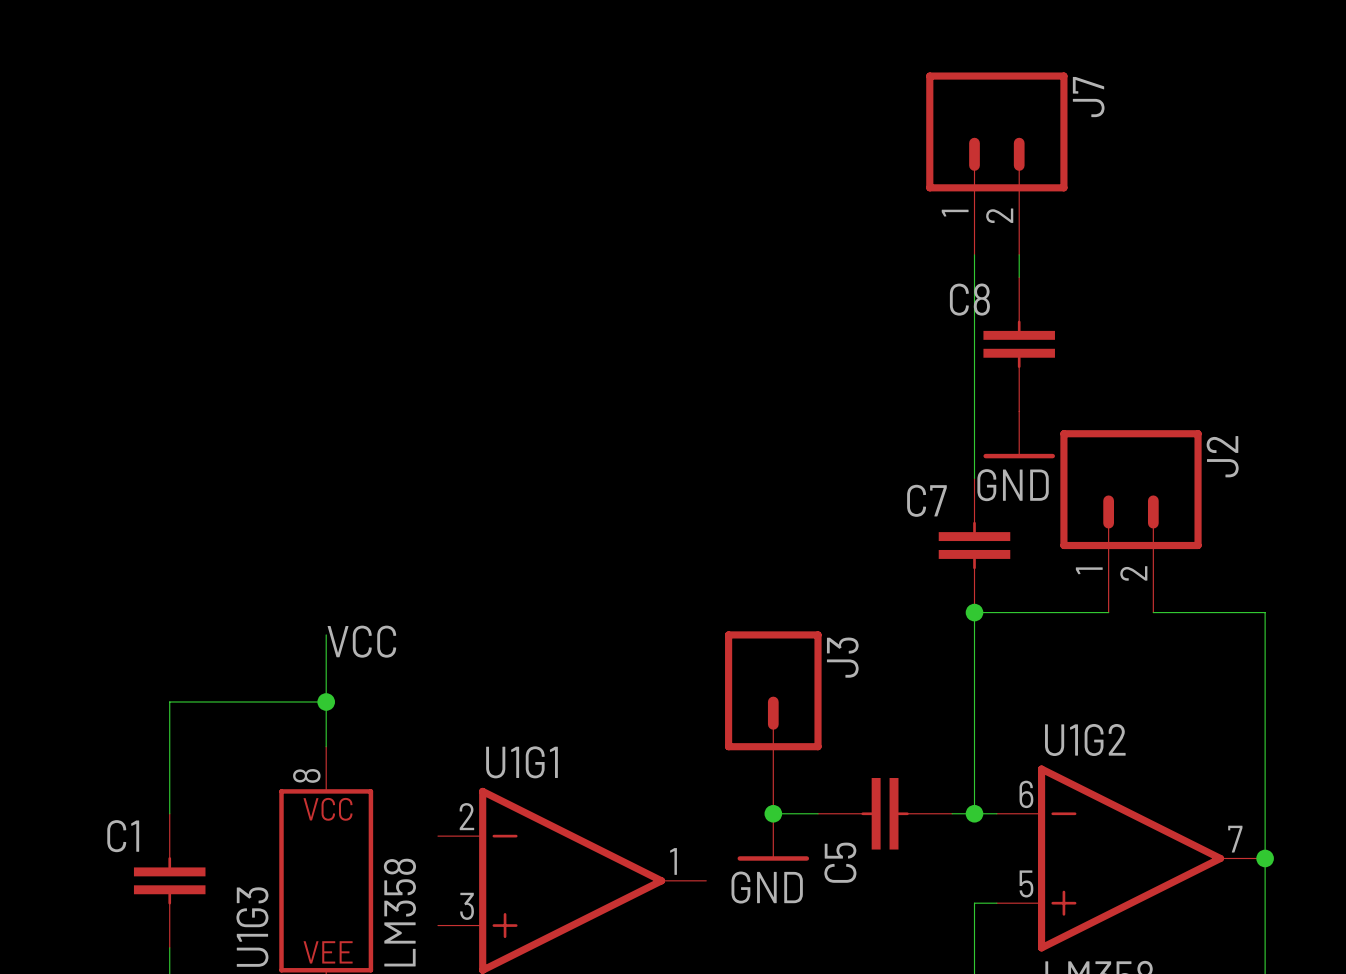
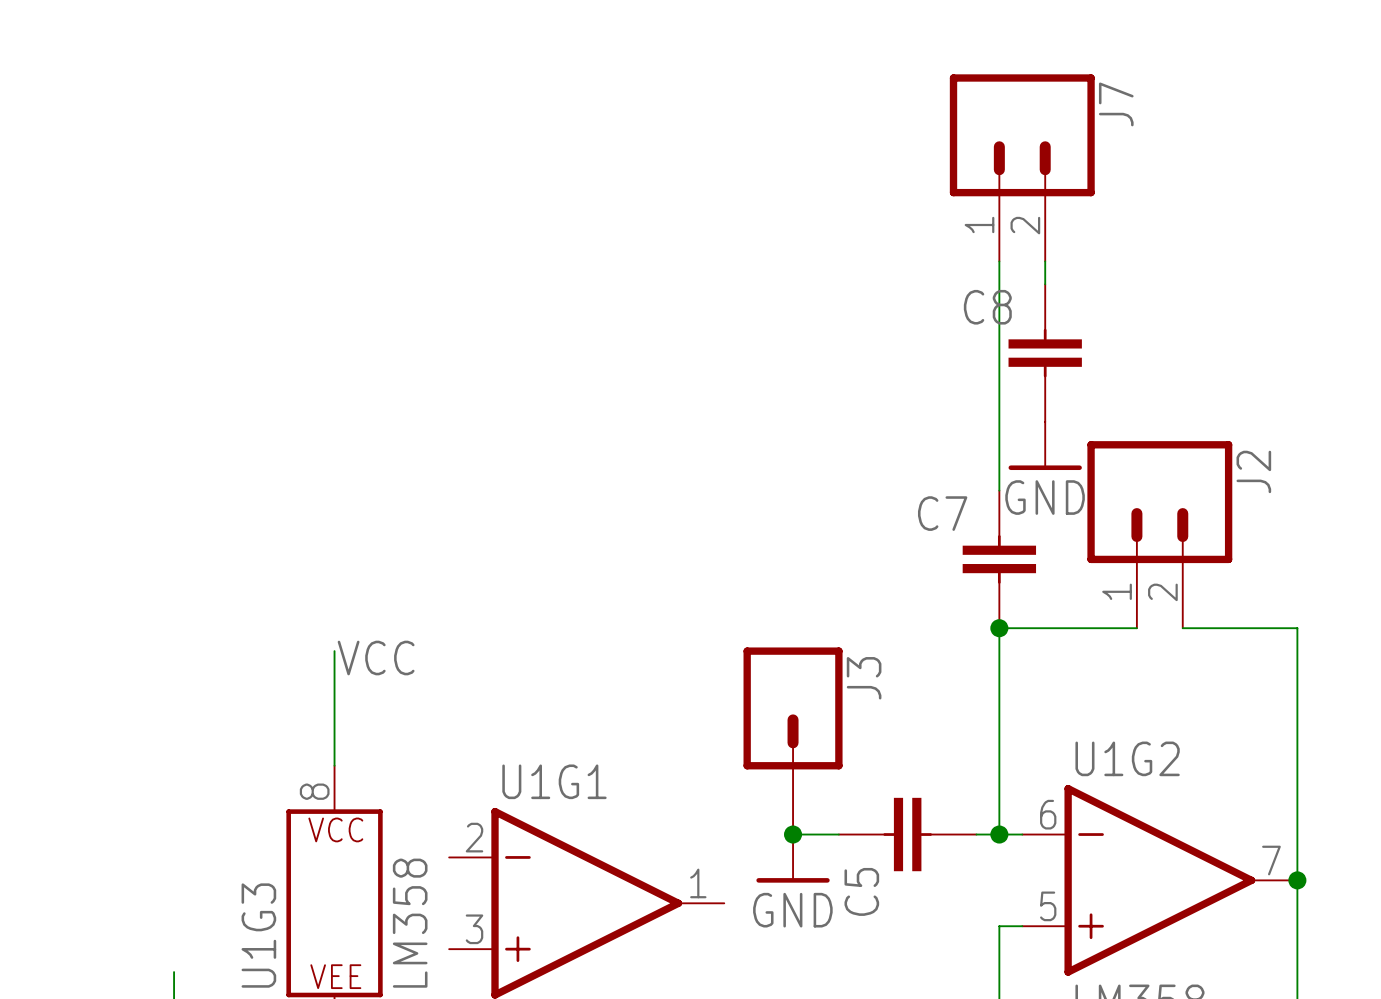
wire: (326, 701) (169, 701) (169, 813) -> none
junction: (326, 701) -> none
C1: (169, 880) -> none

